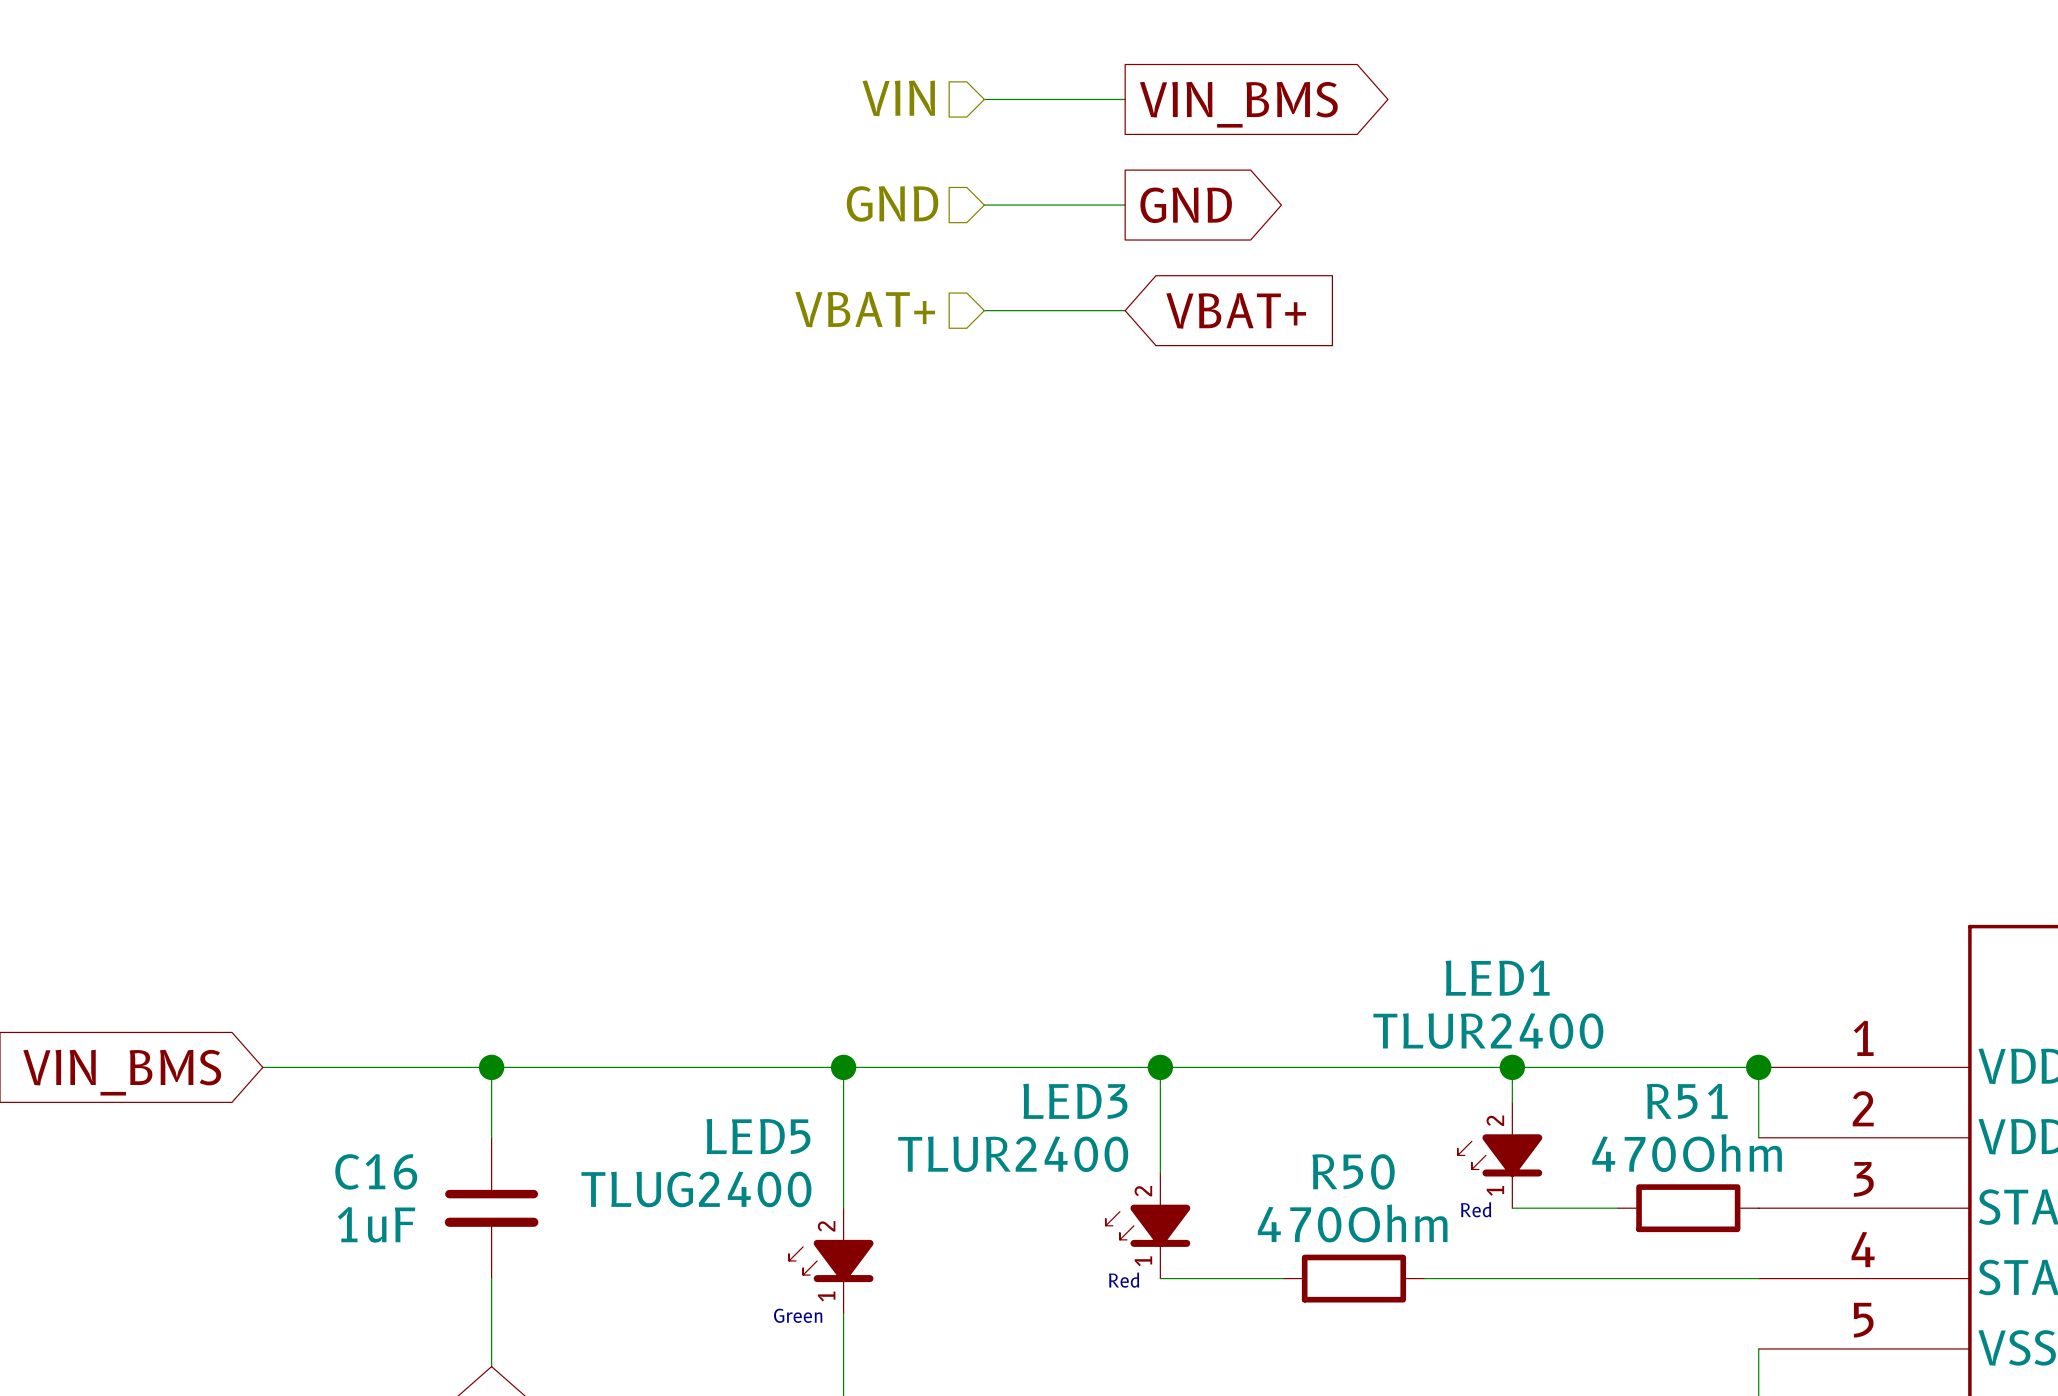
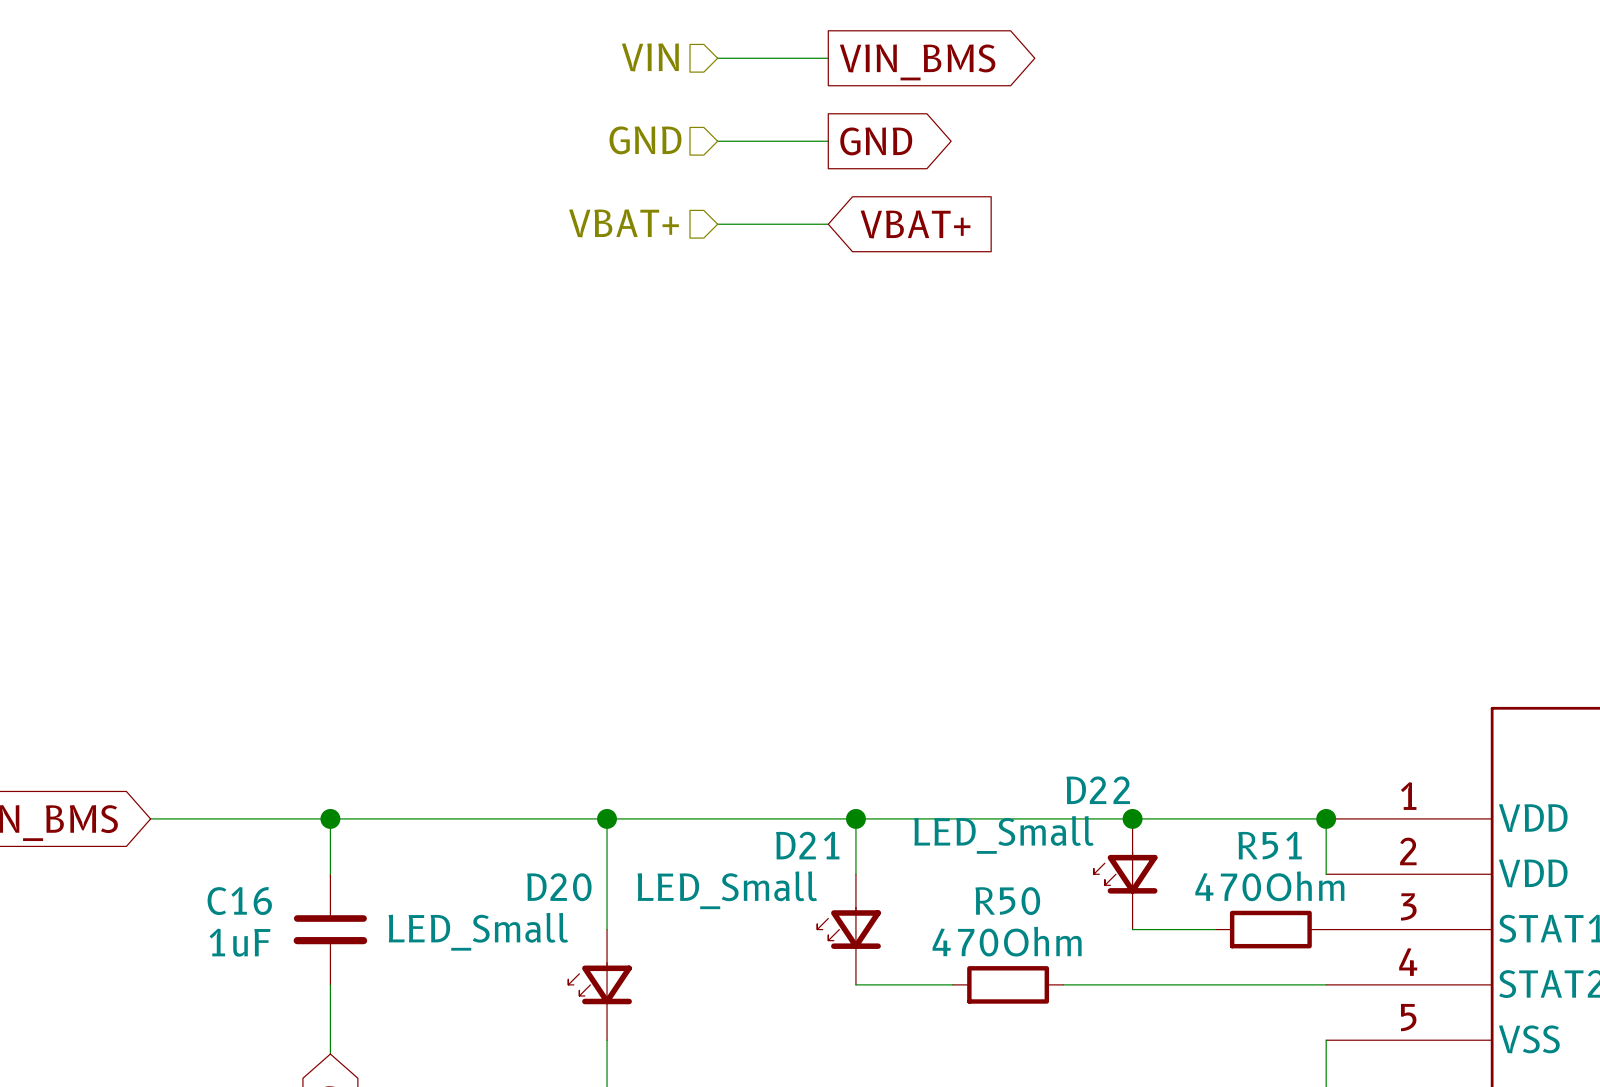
D22: none -> LED_Small (1125, 874)
LED1: TLUR2400 (1500, 1155) -> none
D21: none -> LED_Small (849, 929)
text: Red (1476, 1209) -> none
LED3: TLUR2400 (1148, 1225) -> none
LED5: TLUG2400 (831, 1260) -> none
D20: none -> LED_Small (600, 984)
text: Red (1124, 1280) -> none
text: Green (798, 1315) -> none

